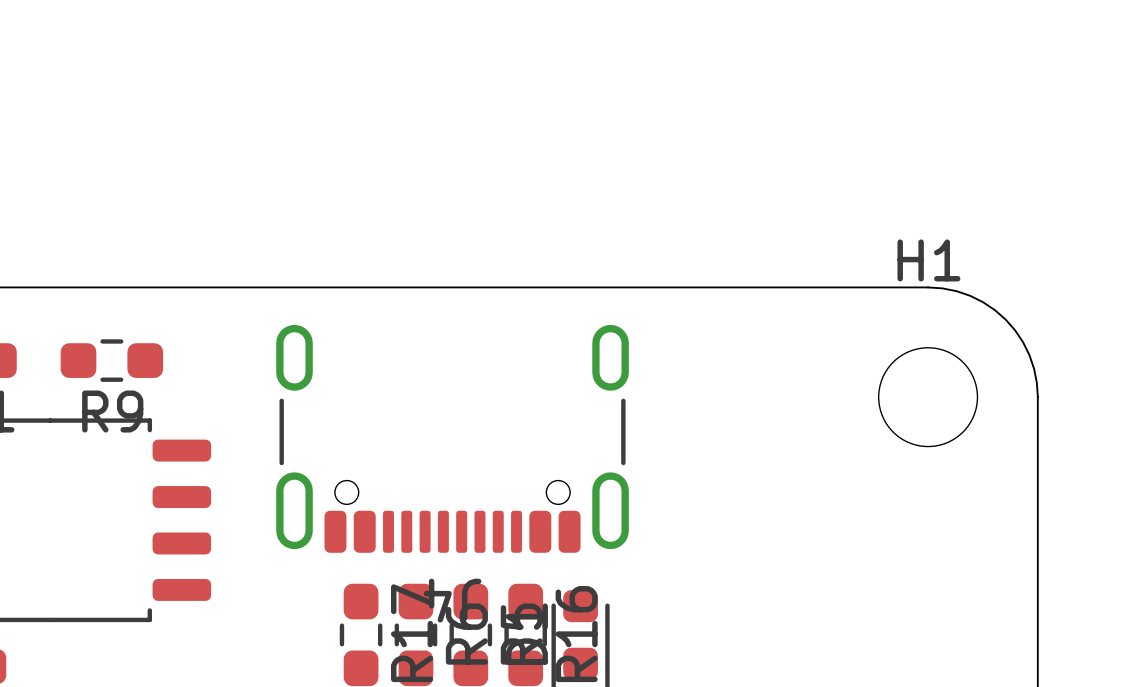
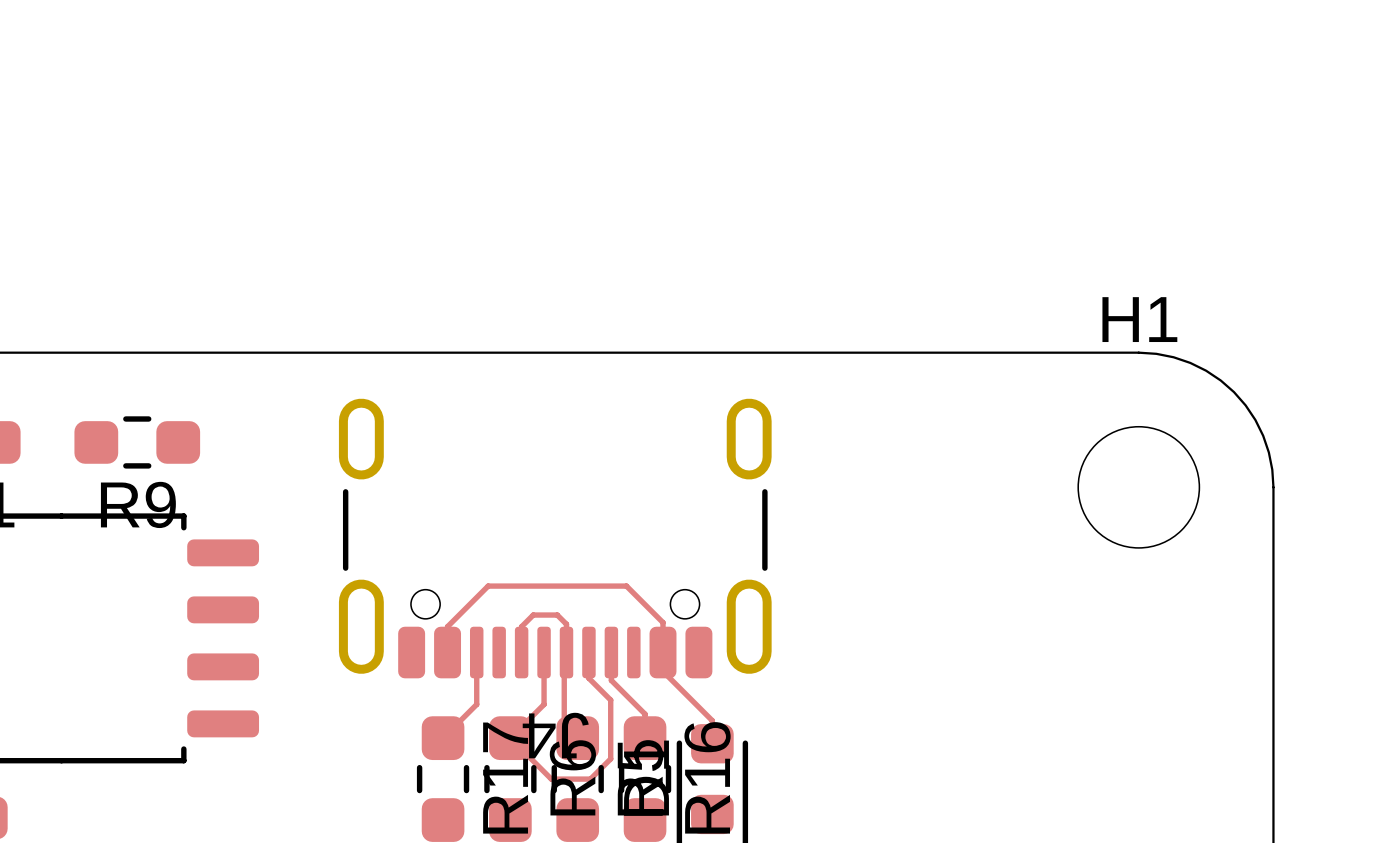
top track: none -> (447, 652) (447, 626) (488, 586) (626, 586) (663, 622) (663, 671) (712, 720) (712, 743)
top track: none -> (476, 652) (476, 704) (443, 738)
top track: none -> (521, 652) (521, 626) (533, 615) (557, 615) (566, 624) (566, 652) (564, 654) (564, 724) (577, 738)
top track: none -> (544, 652) (544, 704) (510, 738) (551, 779) (590, 779) (610, 758) (610, 700) (588, 678) (588, 652)
top track: none -> (611, 652) (611, 680) (645, 714) (645, 738)

